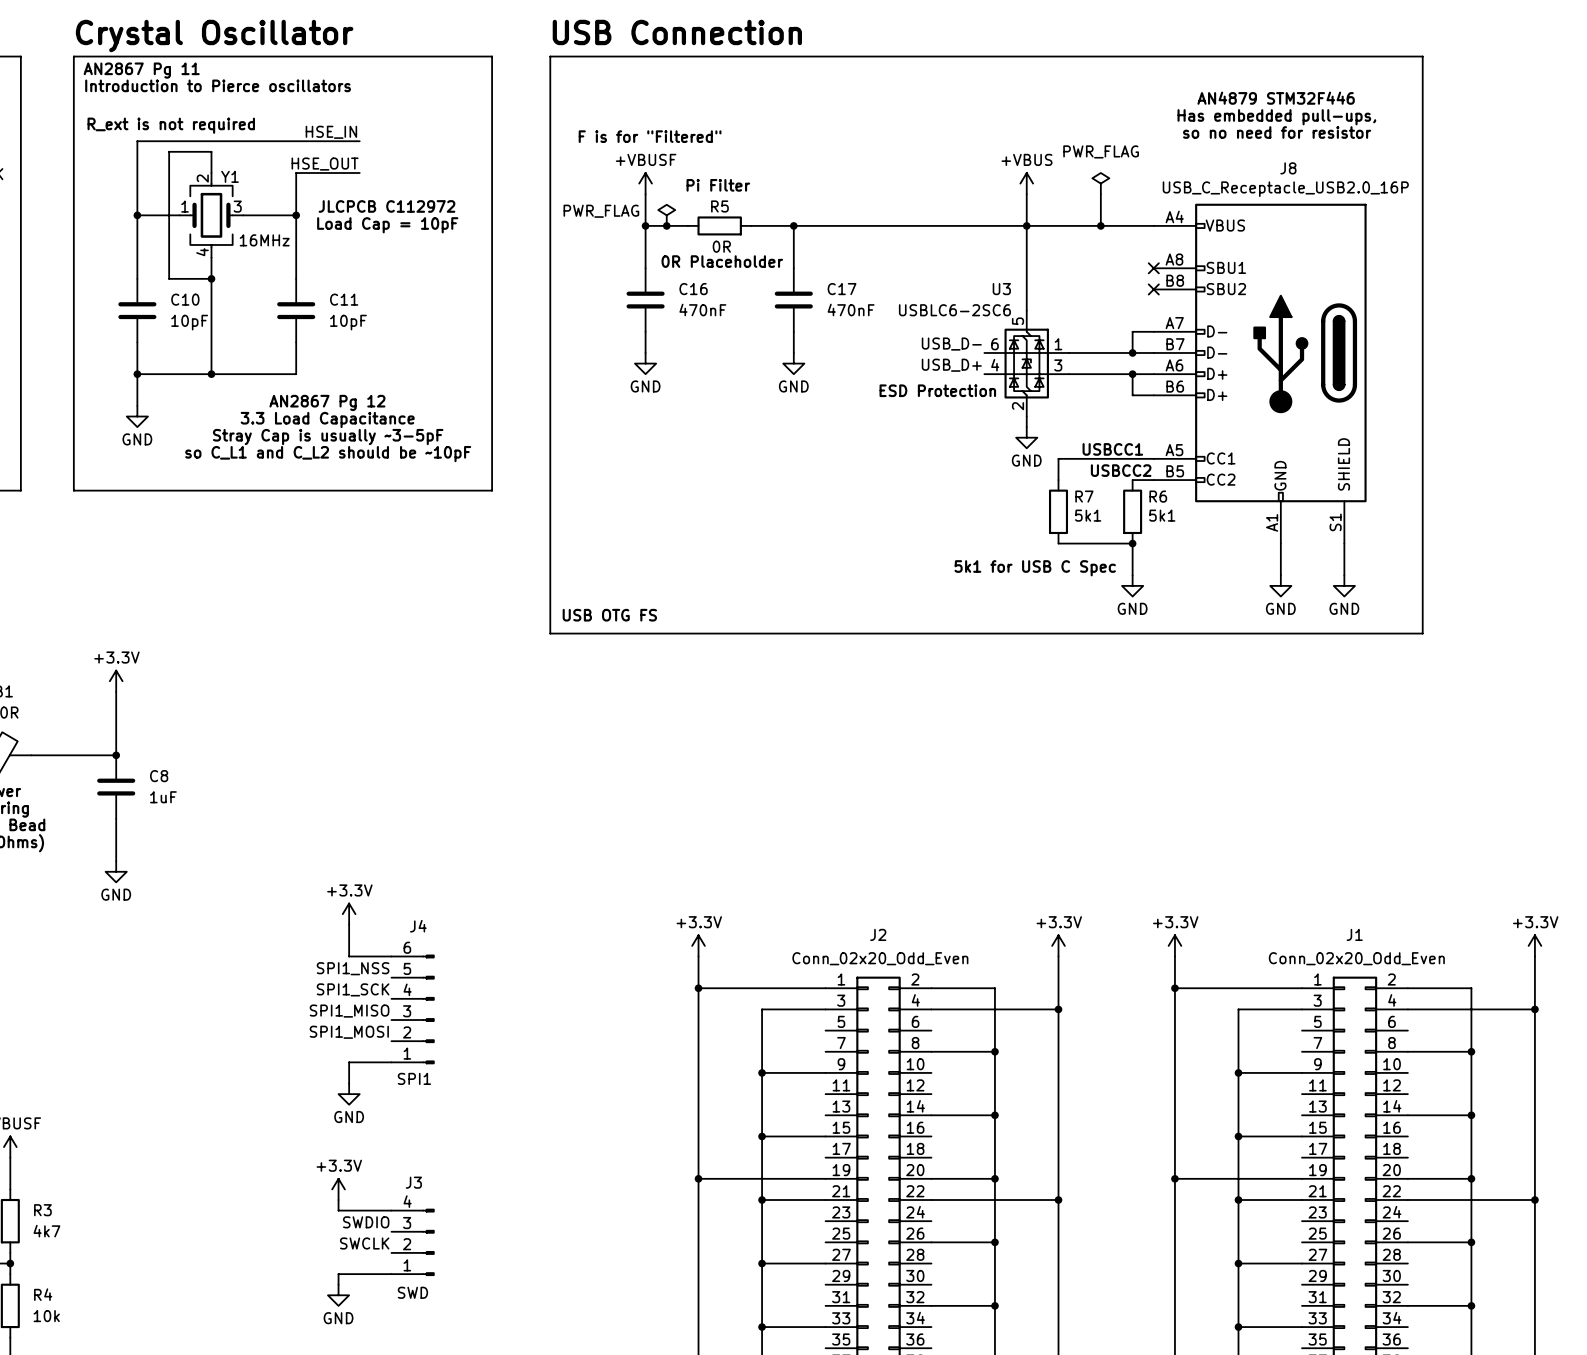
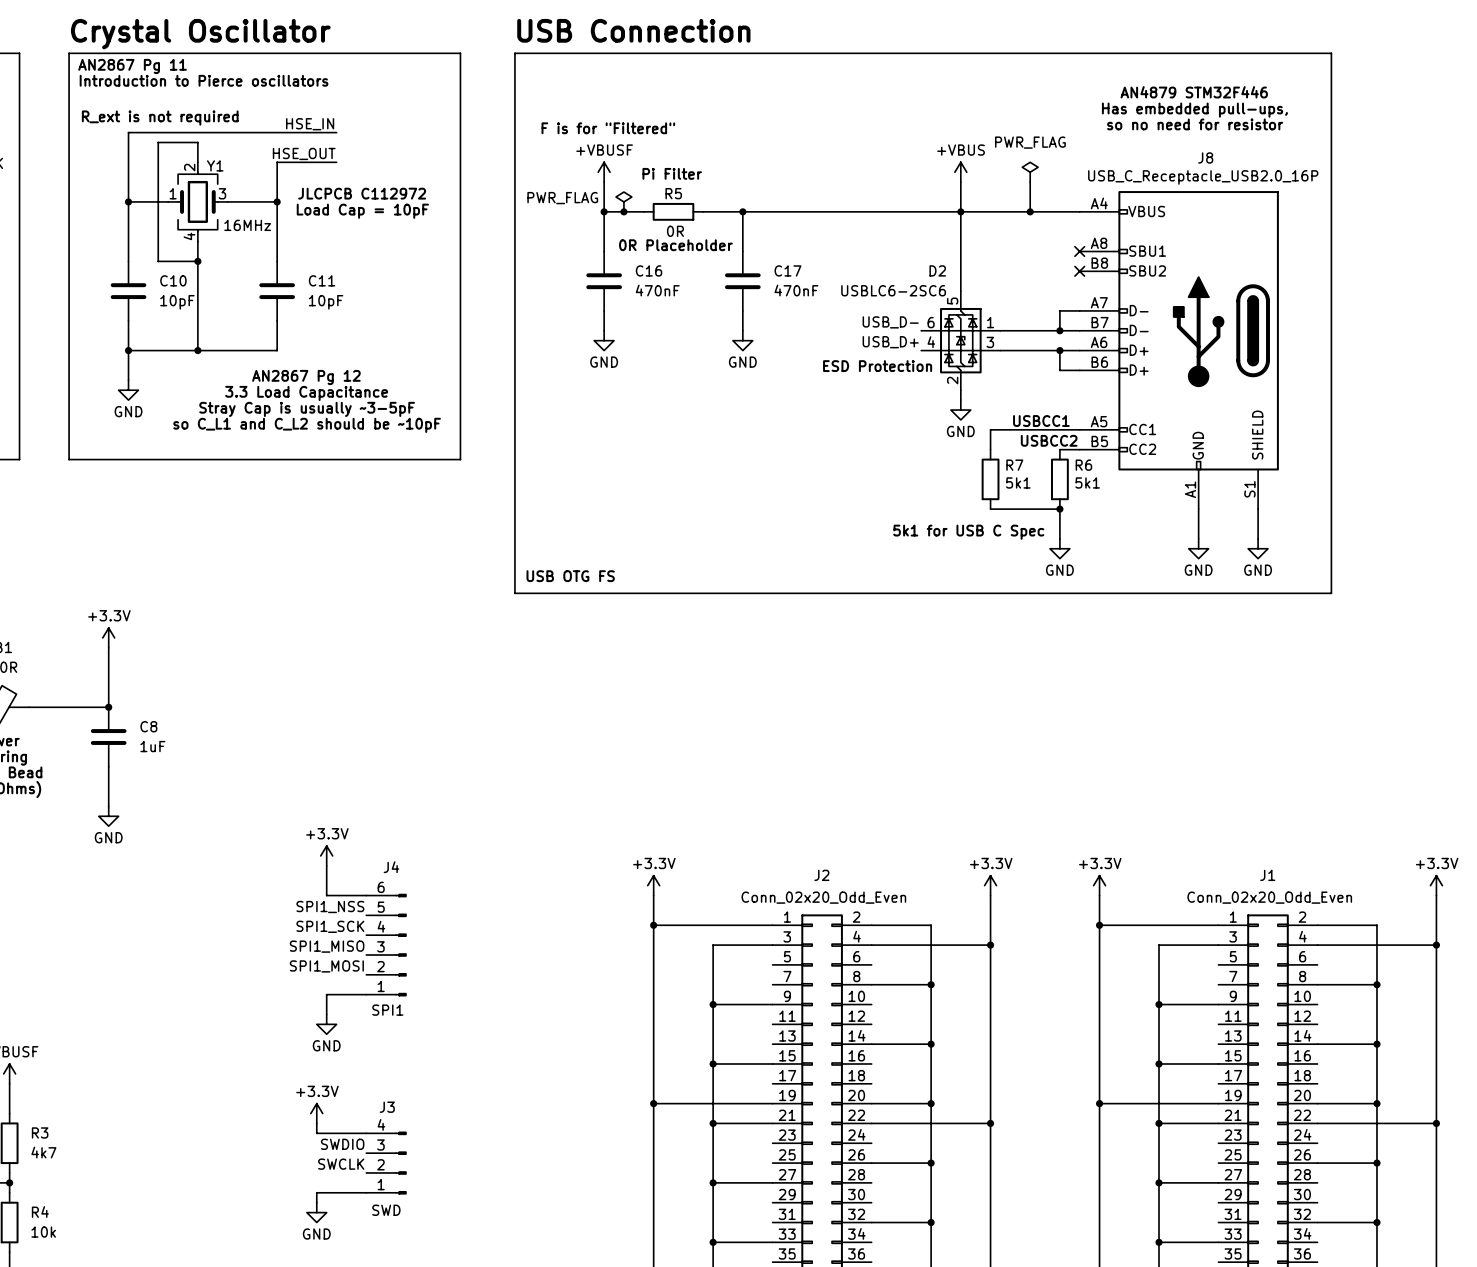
U3 name: U3 (1001, 289) -> D2 (937, 270)

